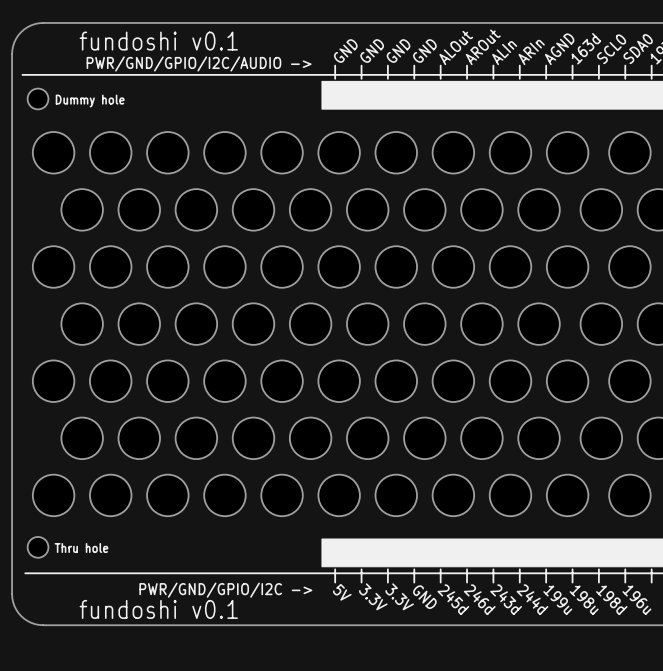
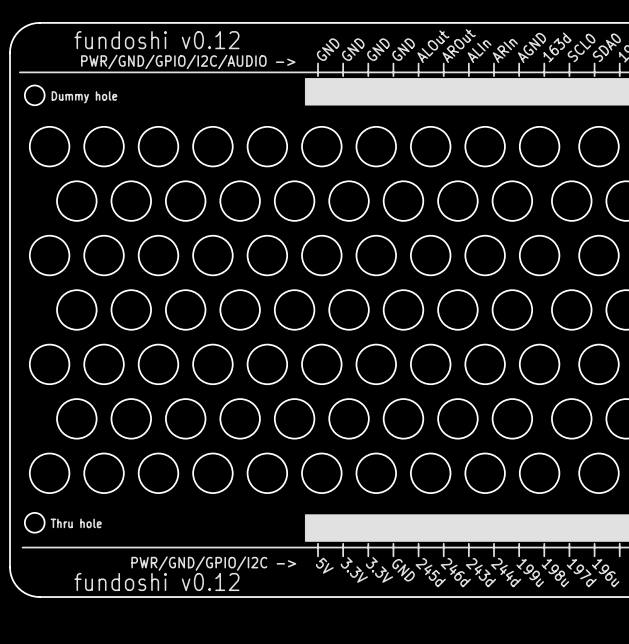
text: fundoshi v0.1 (158, 41) -> fundoshi v0.12 (156, 40)
text: 198d (611, 600) -> 197d (581, 573)
text: fundoshi v0.1 (158, 609) -> fundoshi v0.12 (156, 581)

